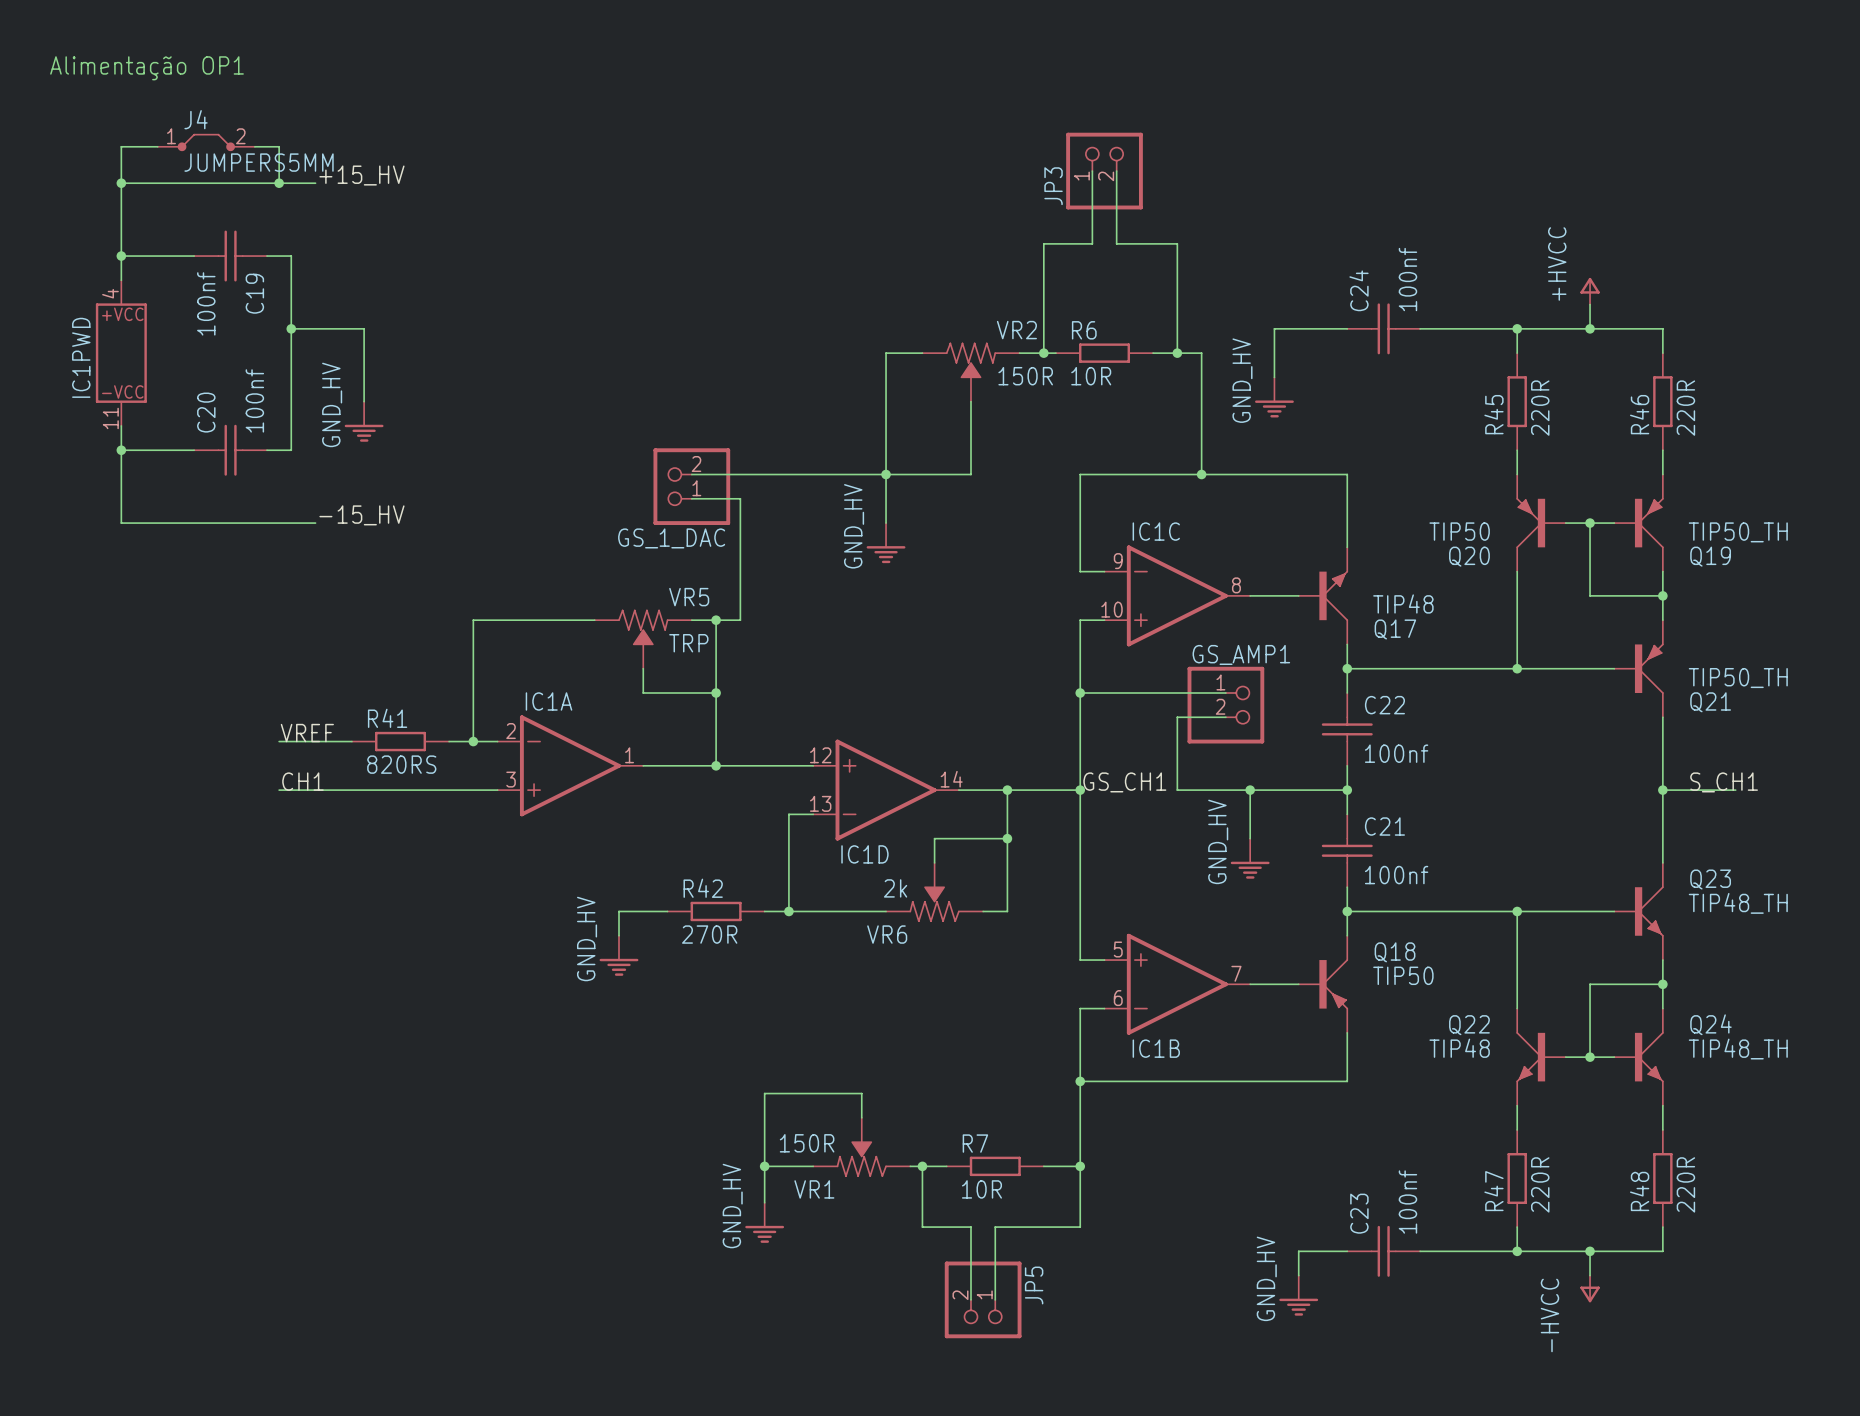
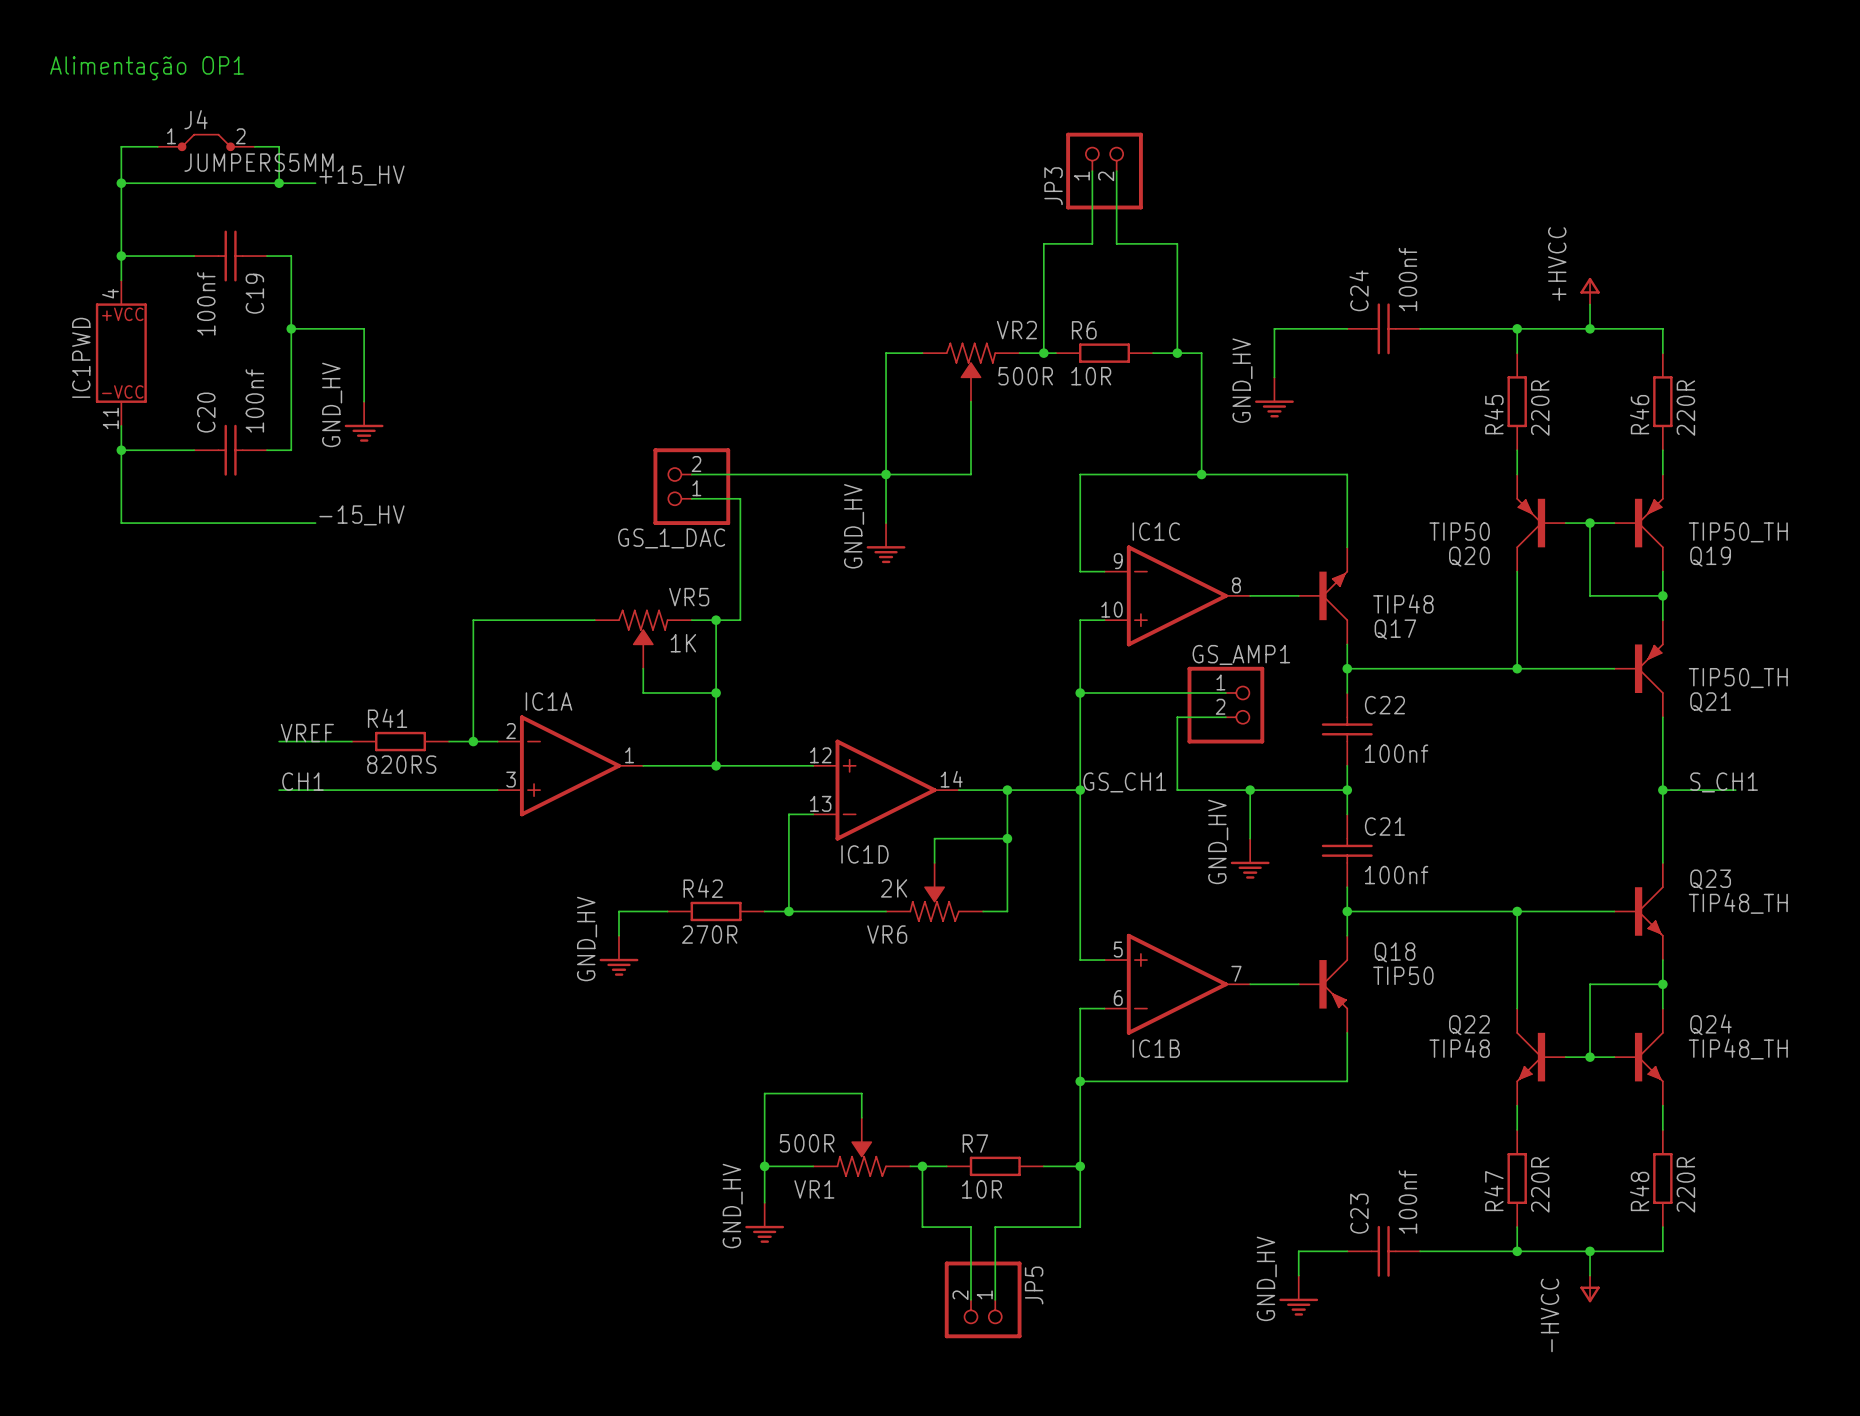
VR2 value: 150R (1025, 376) -> 500R (1025, 376)
VR5 value: TRP (688, 643) -> 1K (683, 643)
VR6 value: 2k (895, 888) -> 2K (894, 888)
VR1 value: 150R (807, 1143) -> 500R (807, 1143)

